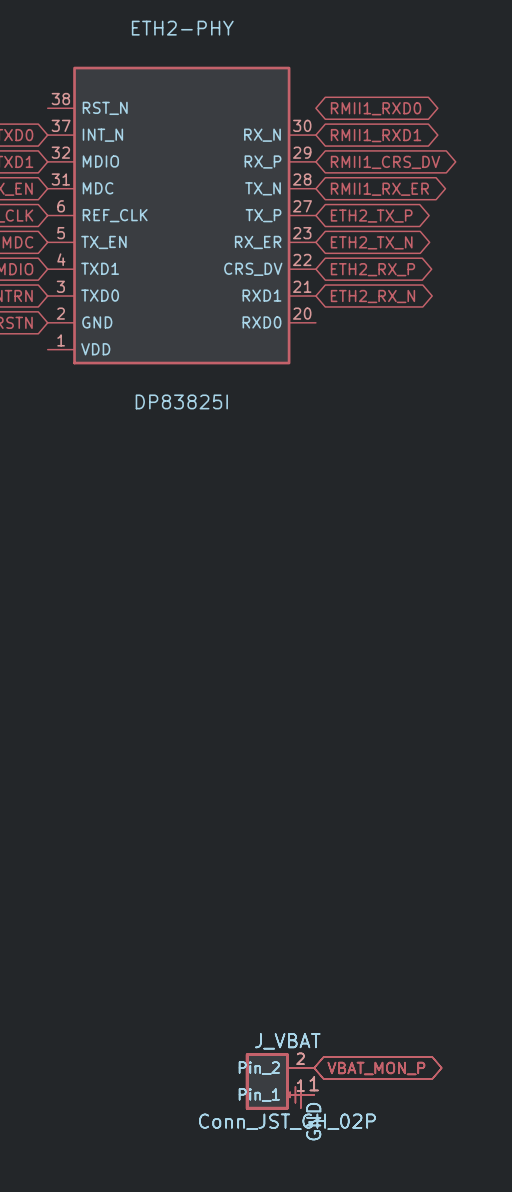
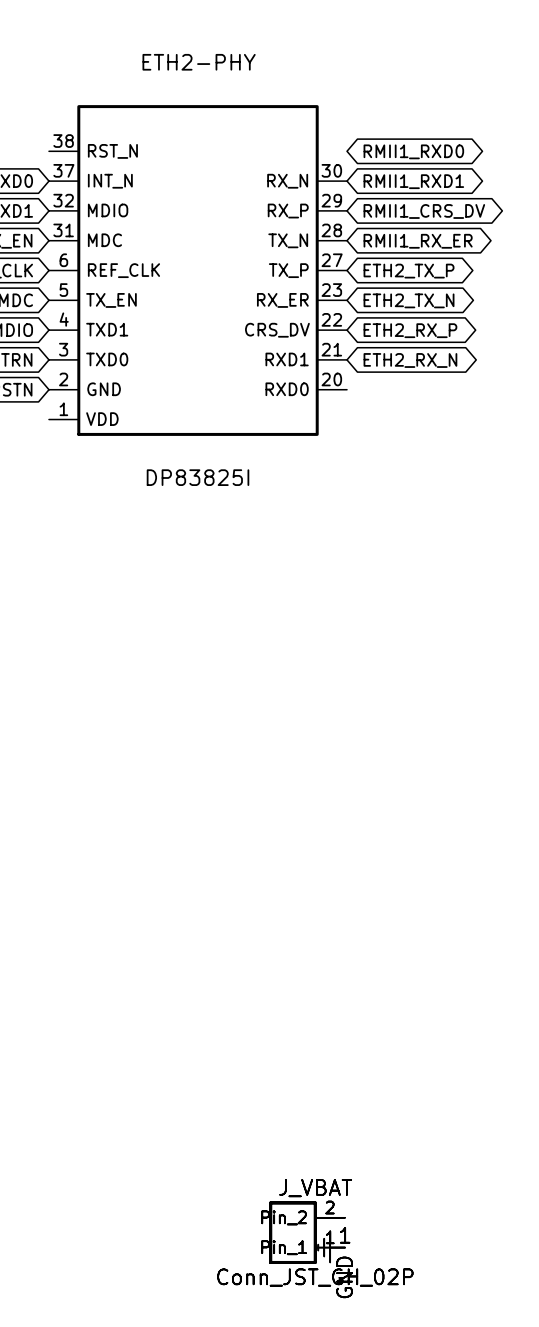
global label: VBAT_MON_P (376, 1068) -> none

